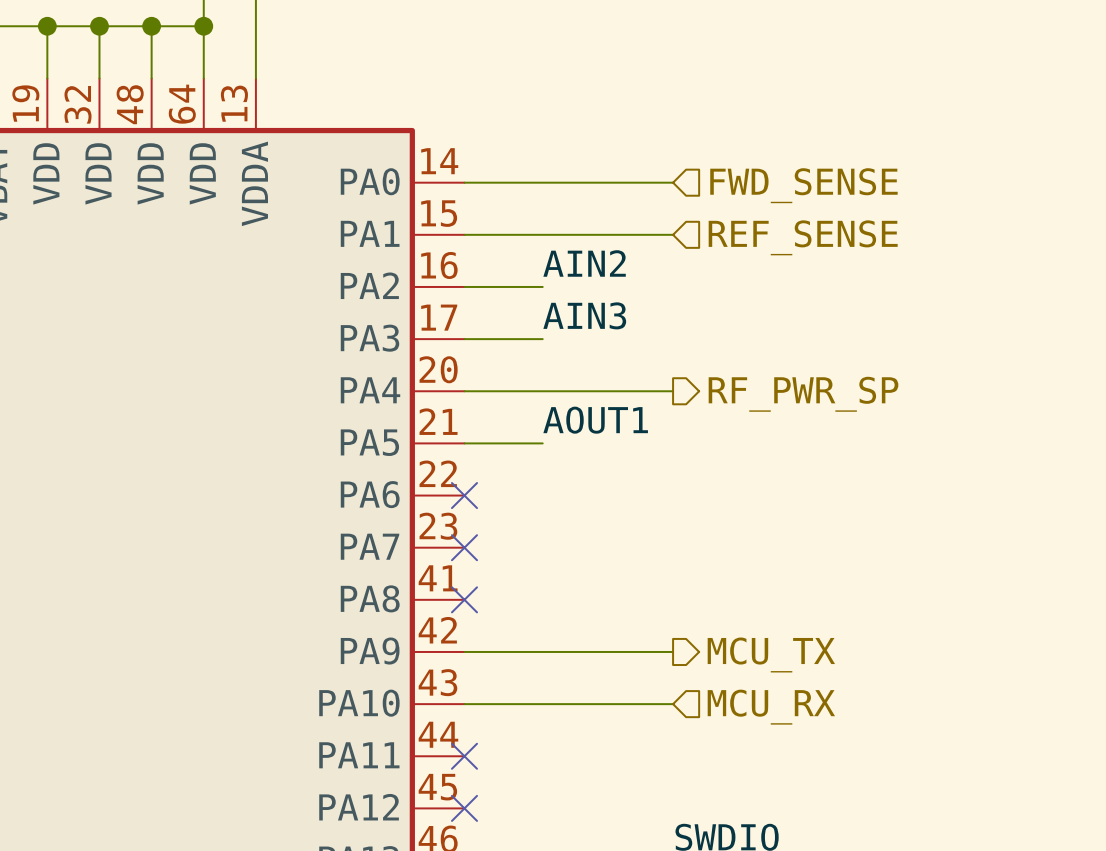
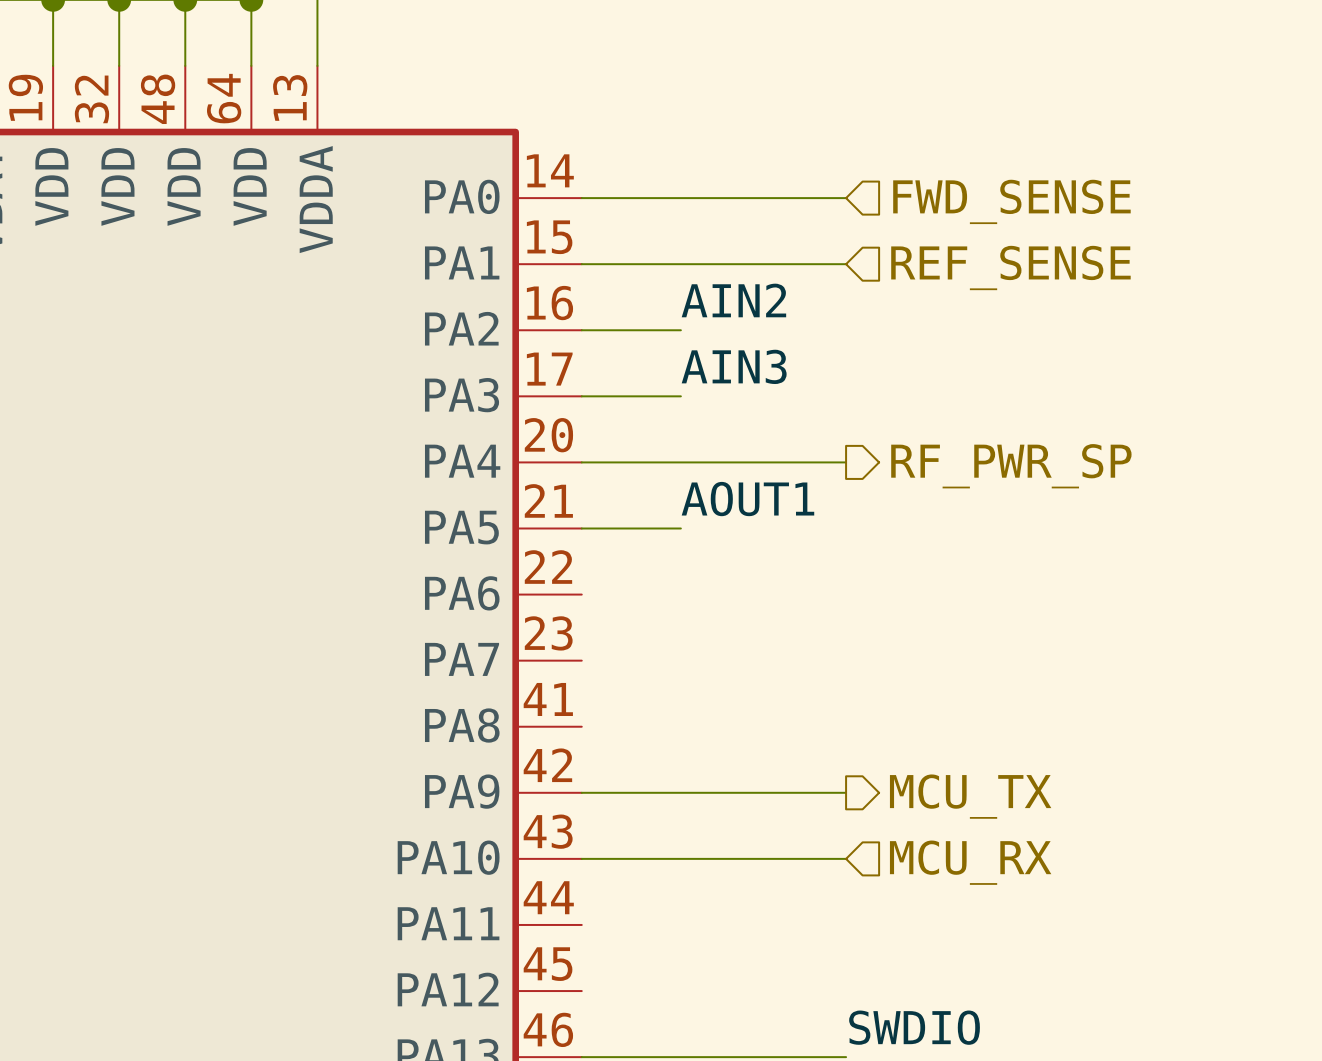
no-connect mark: (464, 495) -> none
no-connect mark: (464, 547) -> none
no-connect mark: (464, 599) -> none
no-connect mark: (464, 756) -> none
no-connect mark: (464, 808) -> none

